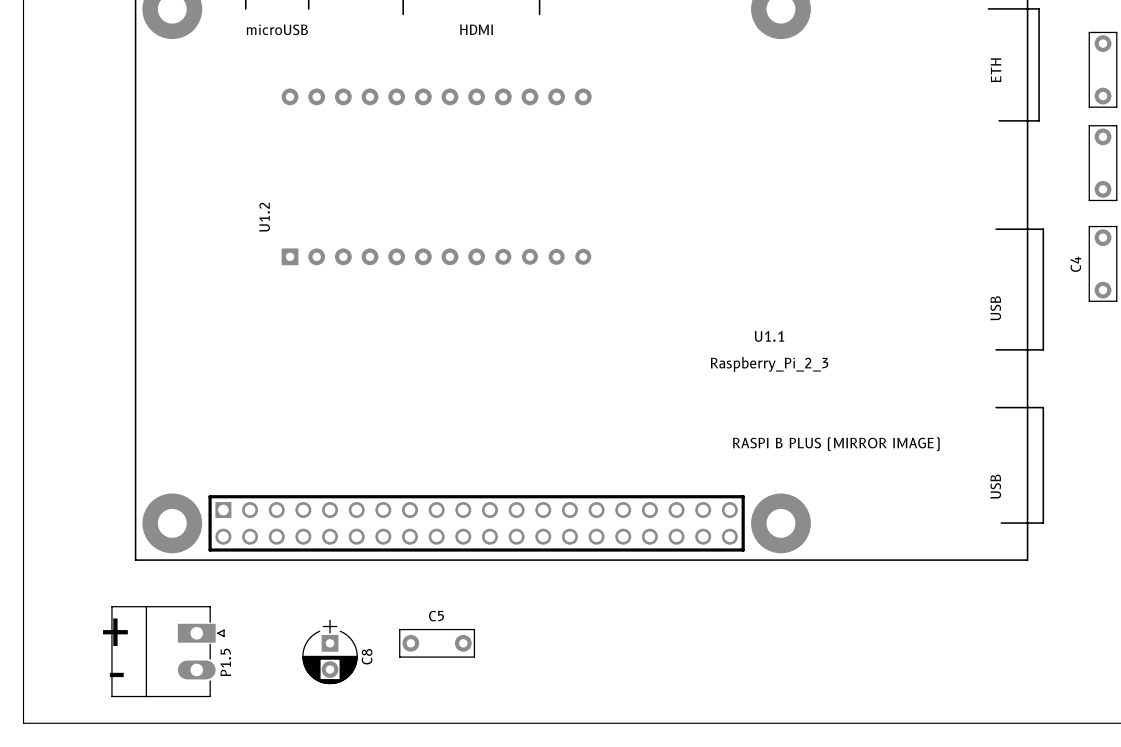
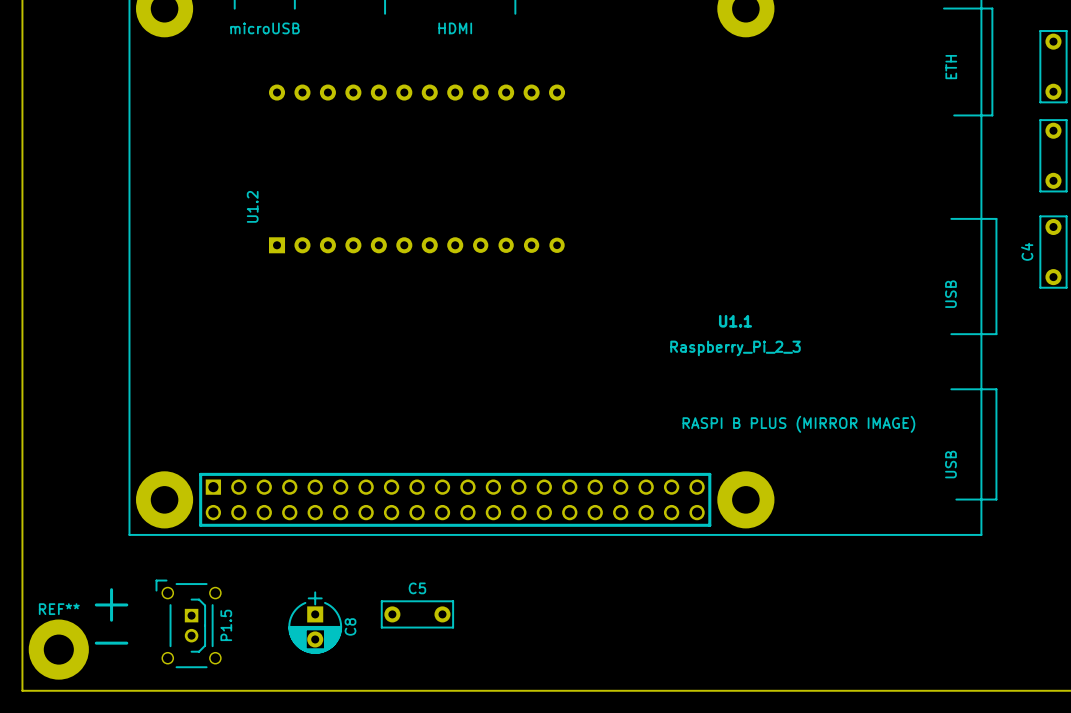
P1.5 footprint: [111, 606, 225, 698] -> [155, 579, 222, 668]
REF**: none -> (58, 649)

